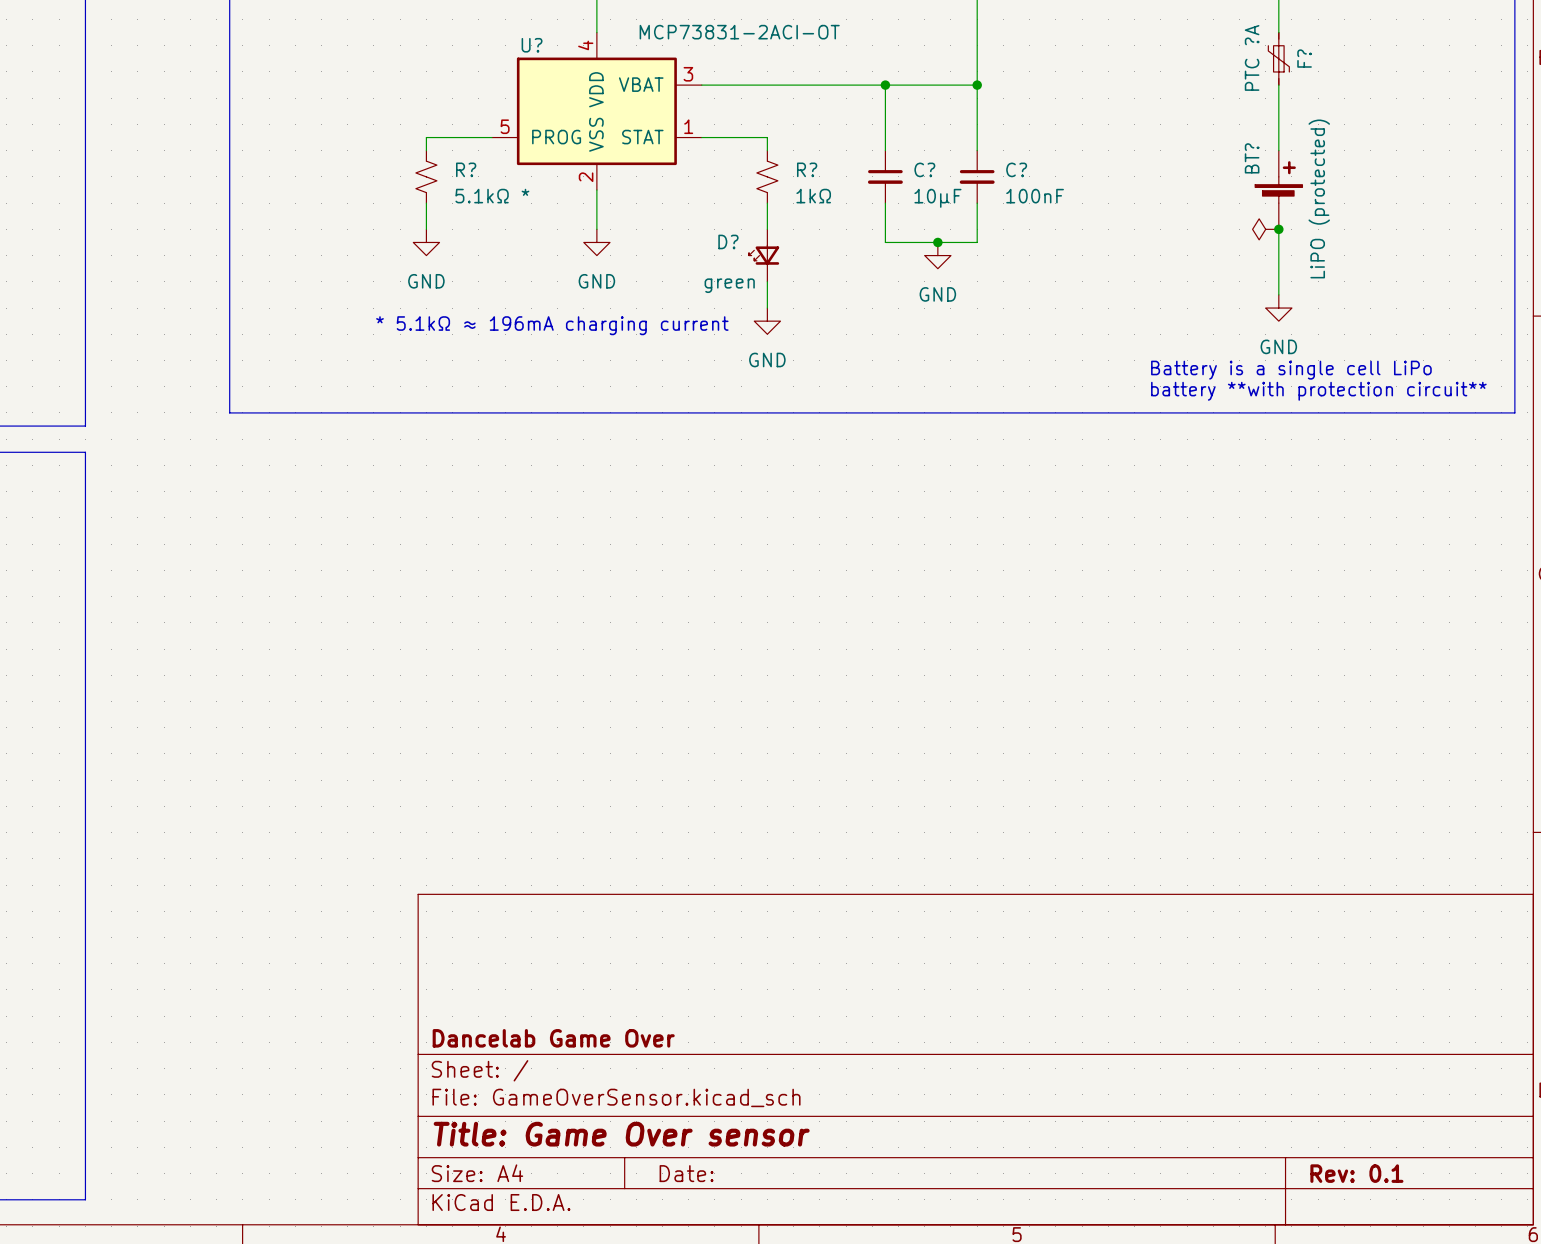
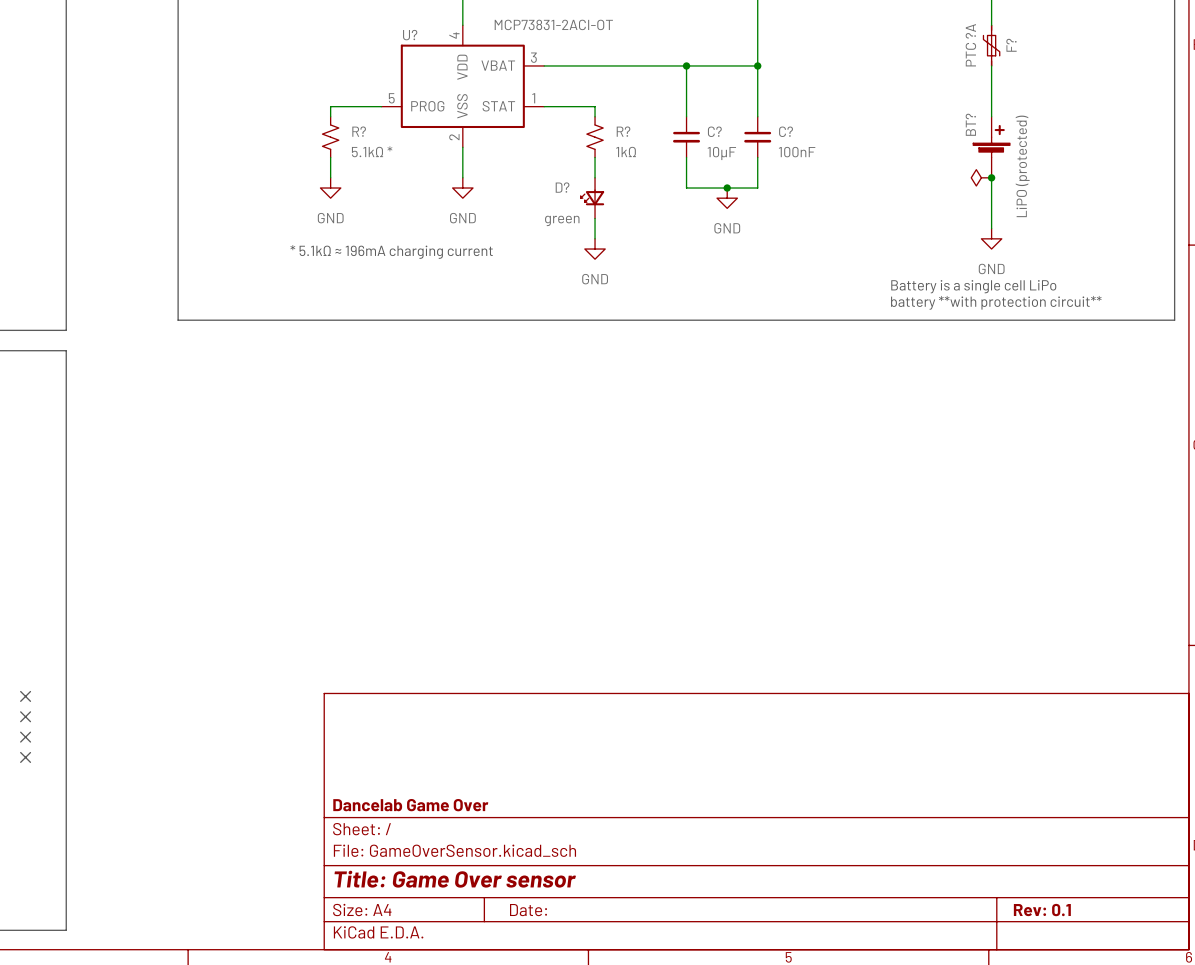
no-connect mark: none -> (25, 696)
no-connect mark: none -> (25, 716)
no-connect mark: none -> (25, 737)
no-connect mark: none -> (25, 757)

